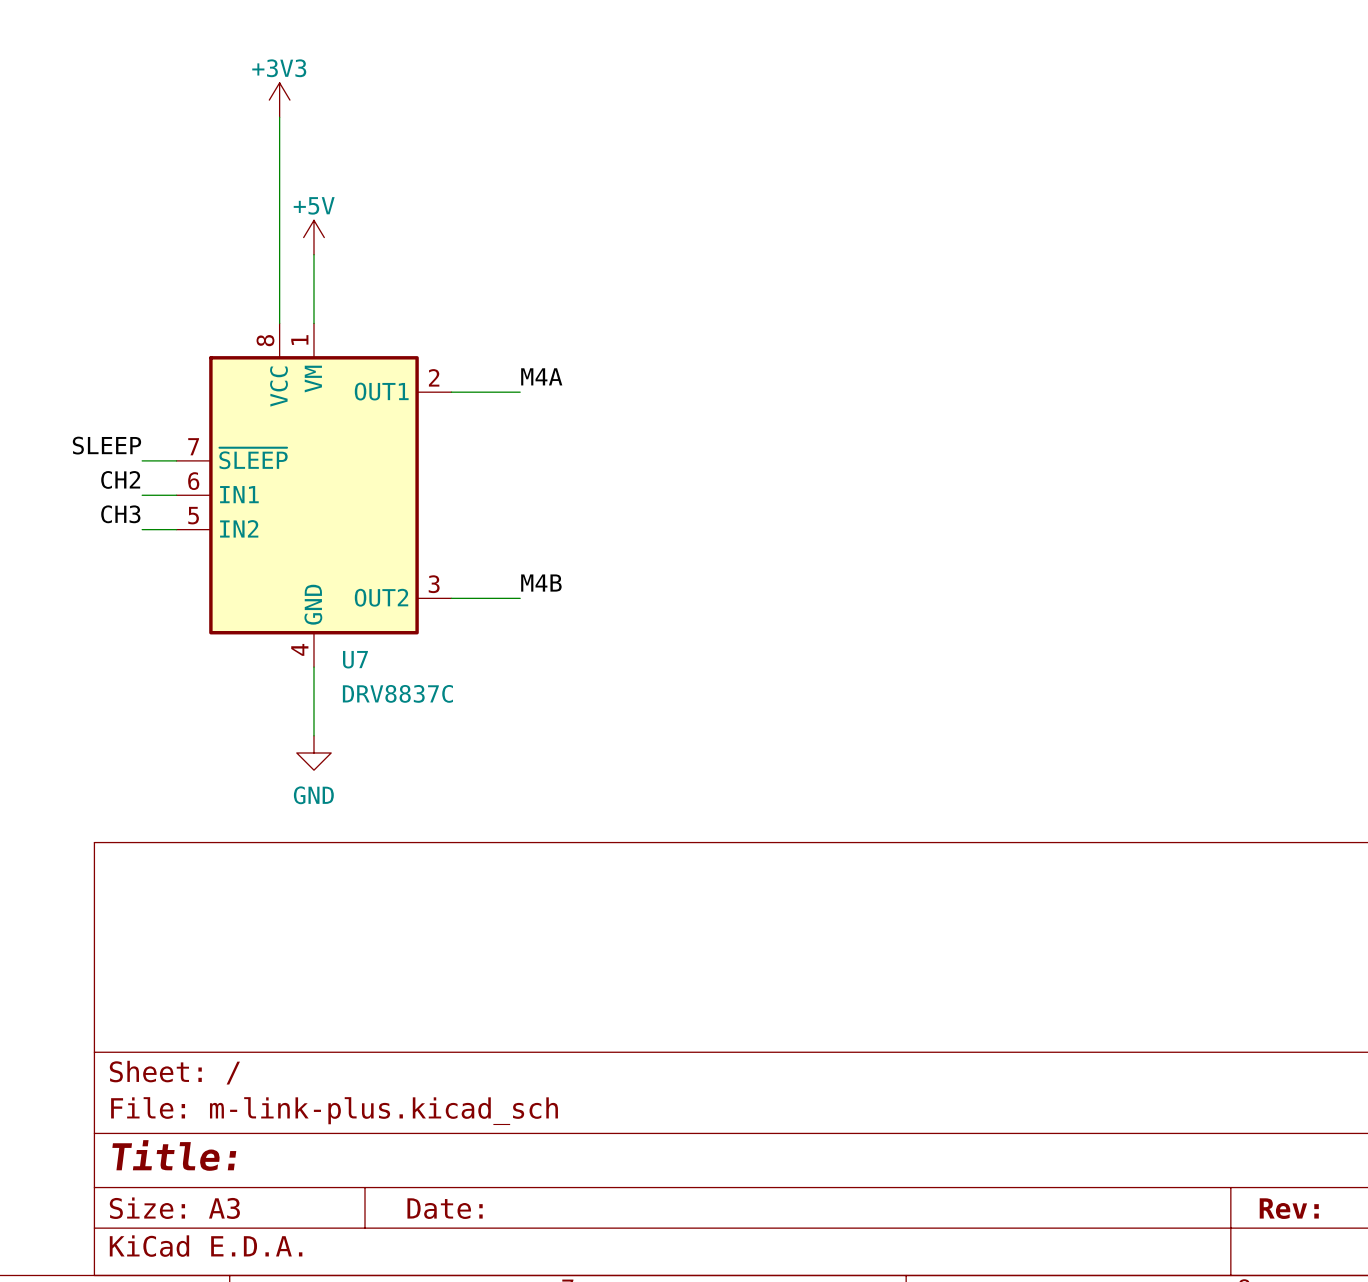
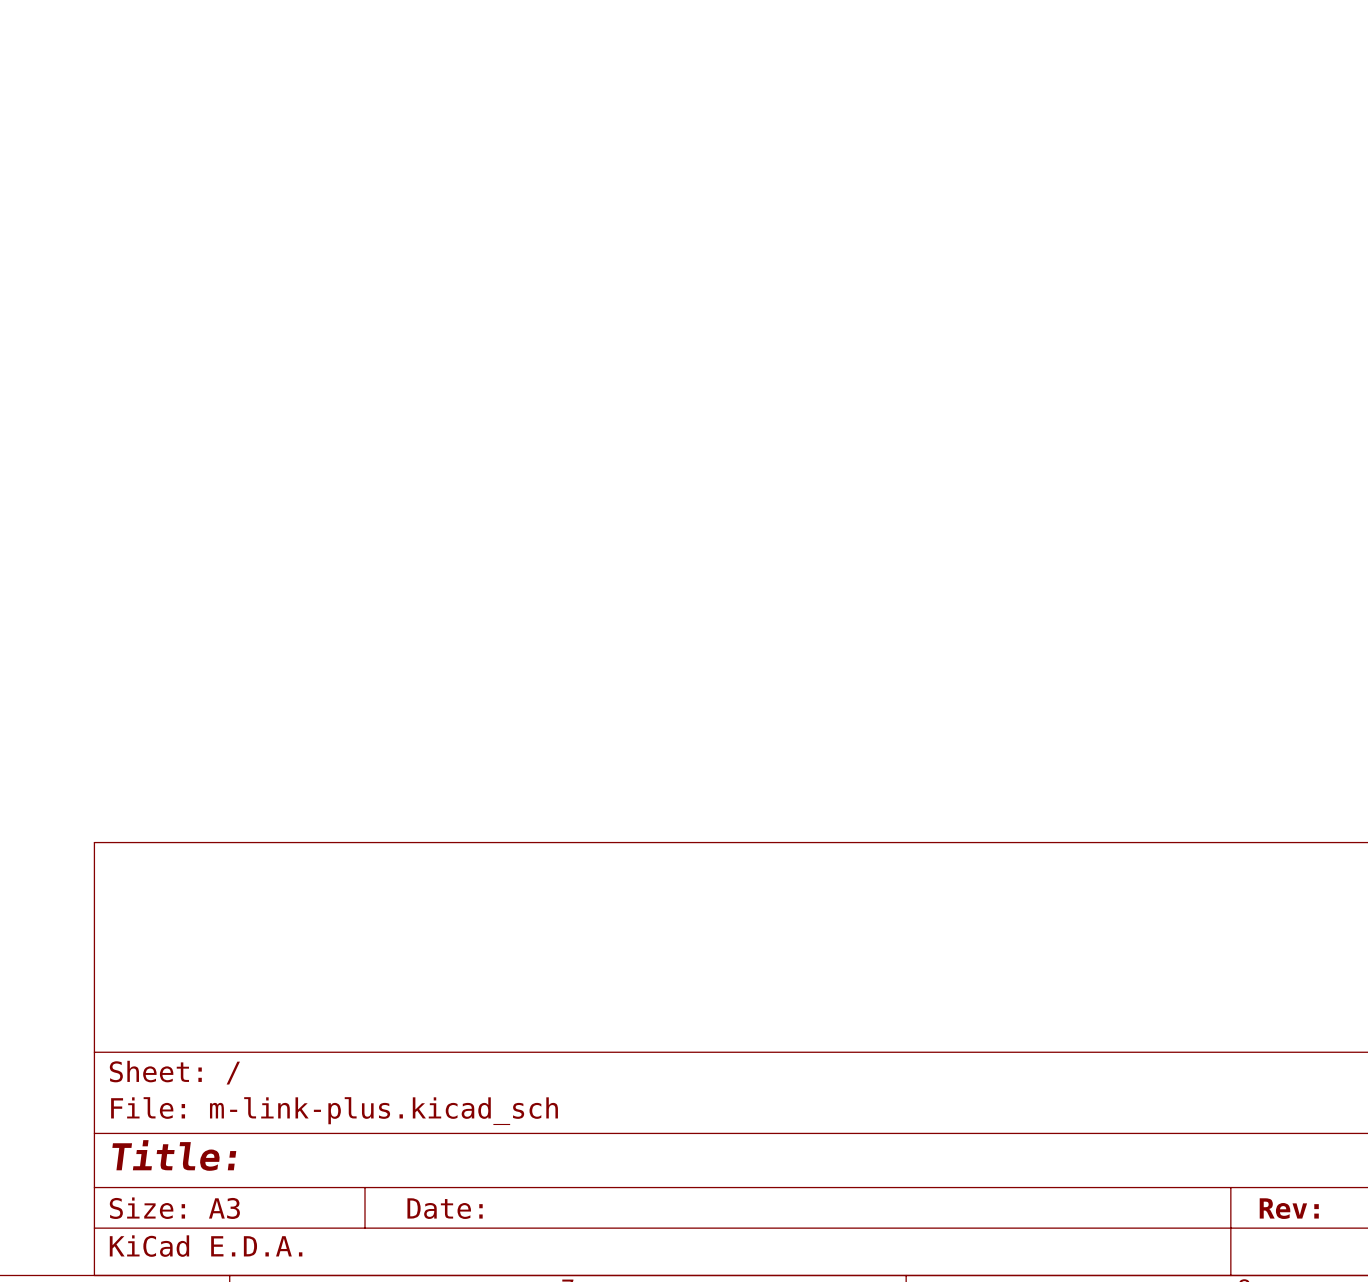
power symbol: +3V3 (279, 100) -> none
wire: (279, 117) (279, 323) -> none
power symbol: +5V (313, 237) -> none
wire: (313, 254) (313, 323) -> none
label: M4A (541, 376) -> none
wire: (451, 392) (520, 392) -> none
label: SLEEP (106, 445) -> none
wire: (142, 460) (176, 460) -> none
label: CH2 (120, 479) -> none
wire: (142, 495) (176, 495) -> none
U7: DRV8837C (313, 495) -> none
label: CH3 (120, 514) -> none
wire: (142, 529) (176, 529) -> none
label: M4B (541, 583) -> none
wire: (451, 598) (520, 598) -> none
wire: (313, 667) (313, 735) -> none
power symbol: GND (313, 752) -> none

